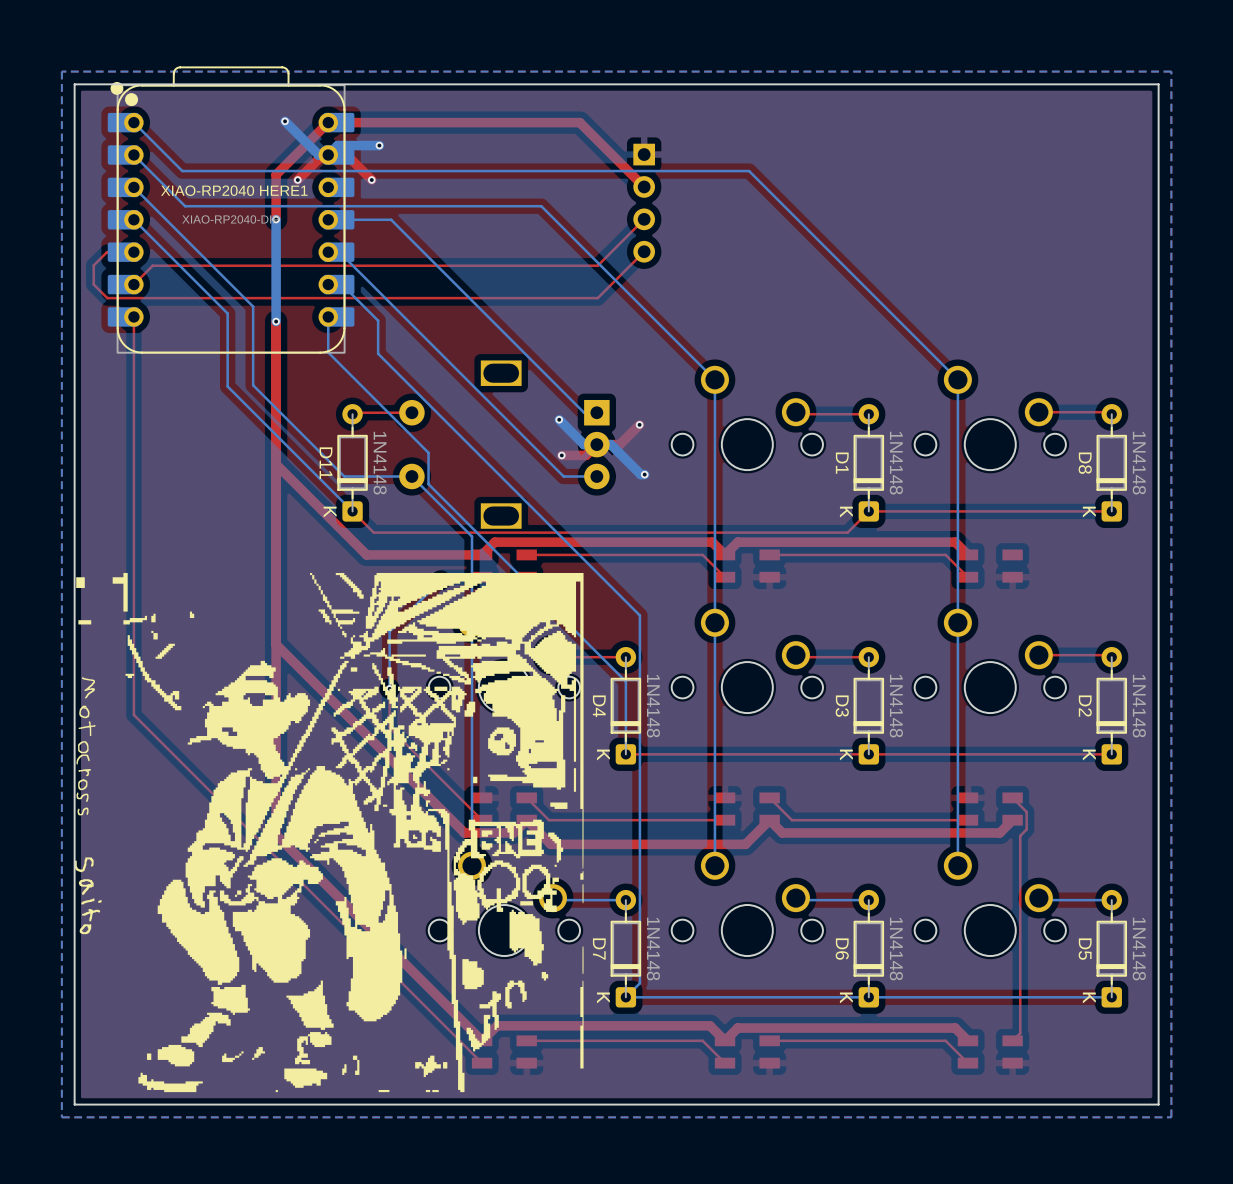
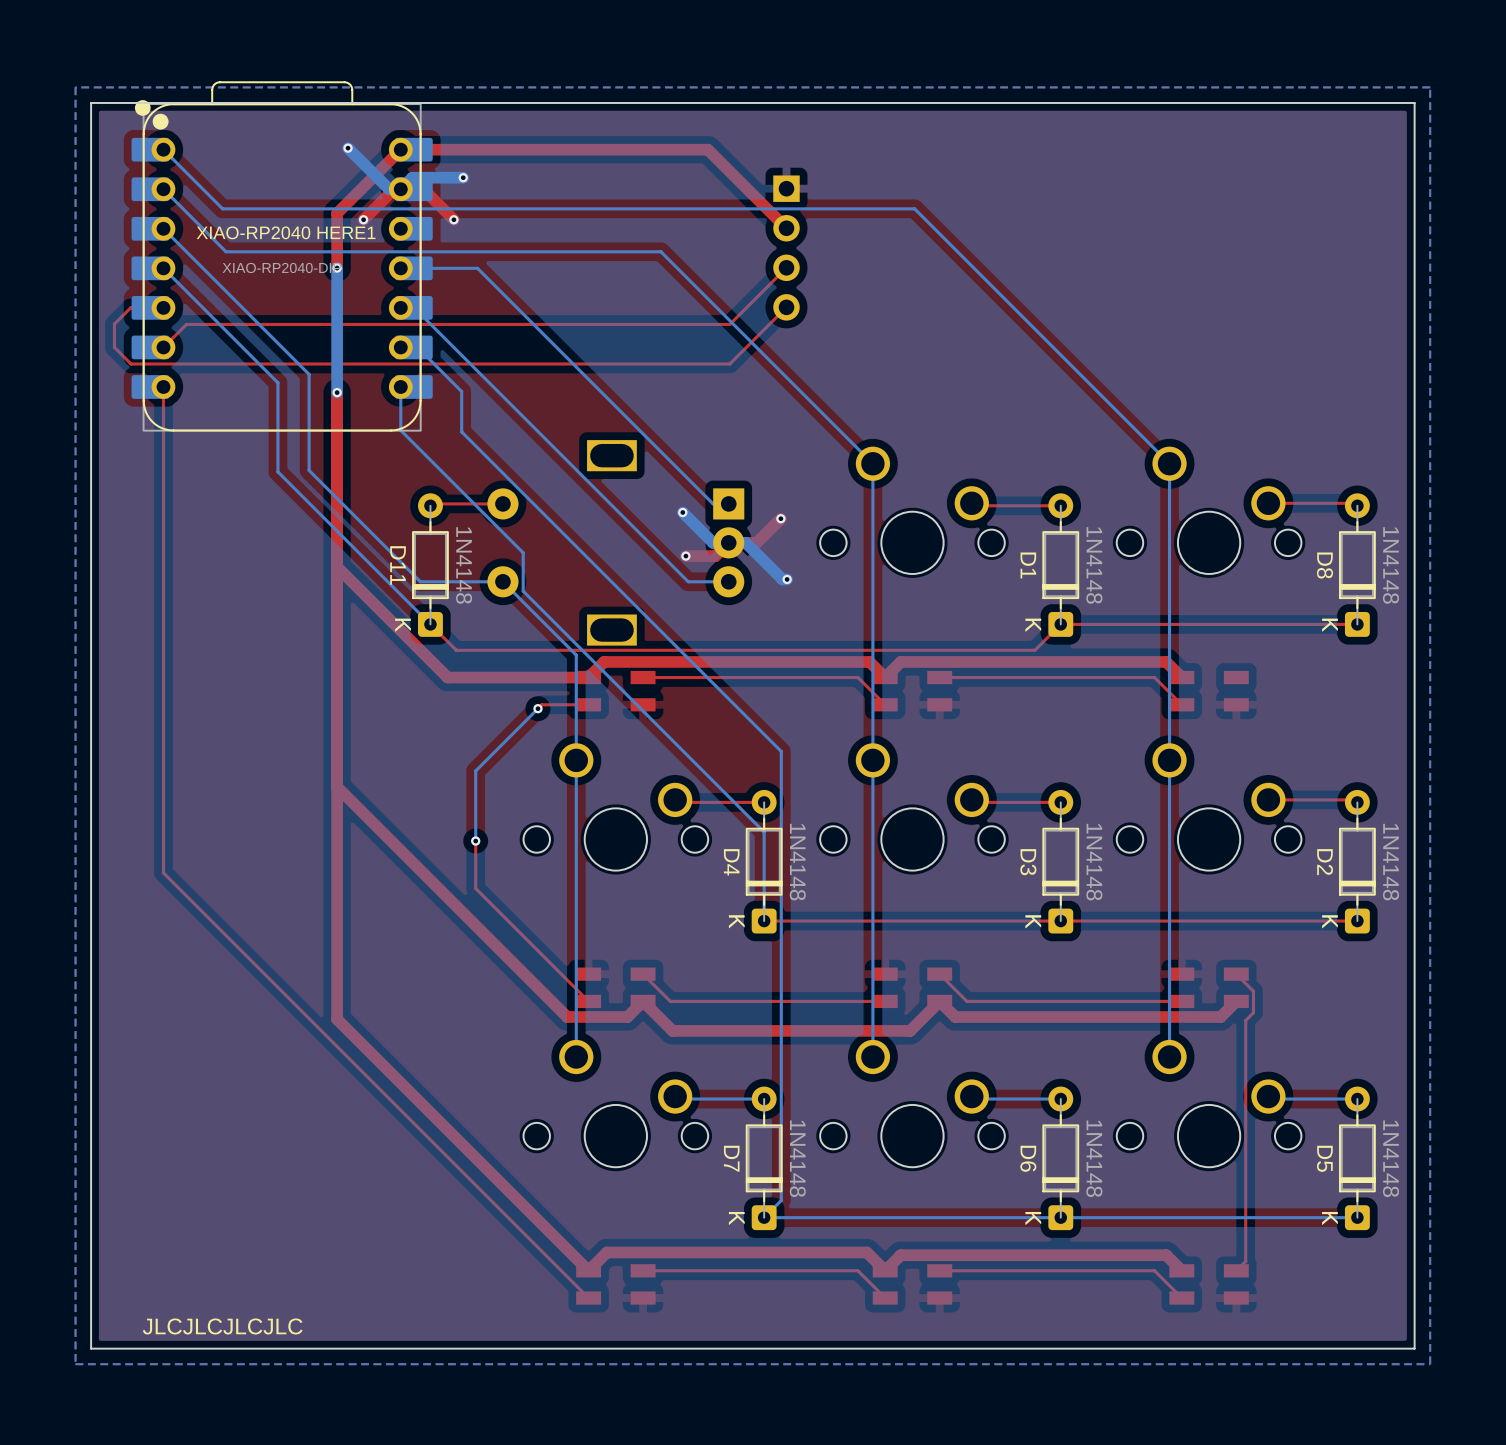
drawing: [74, 572, 584, 1093] -> none
text: none -> JLCJLCJLCJLC (222, 1326)

